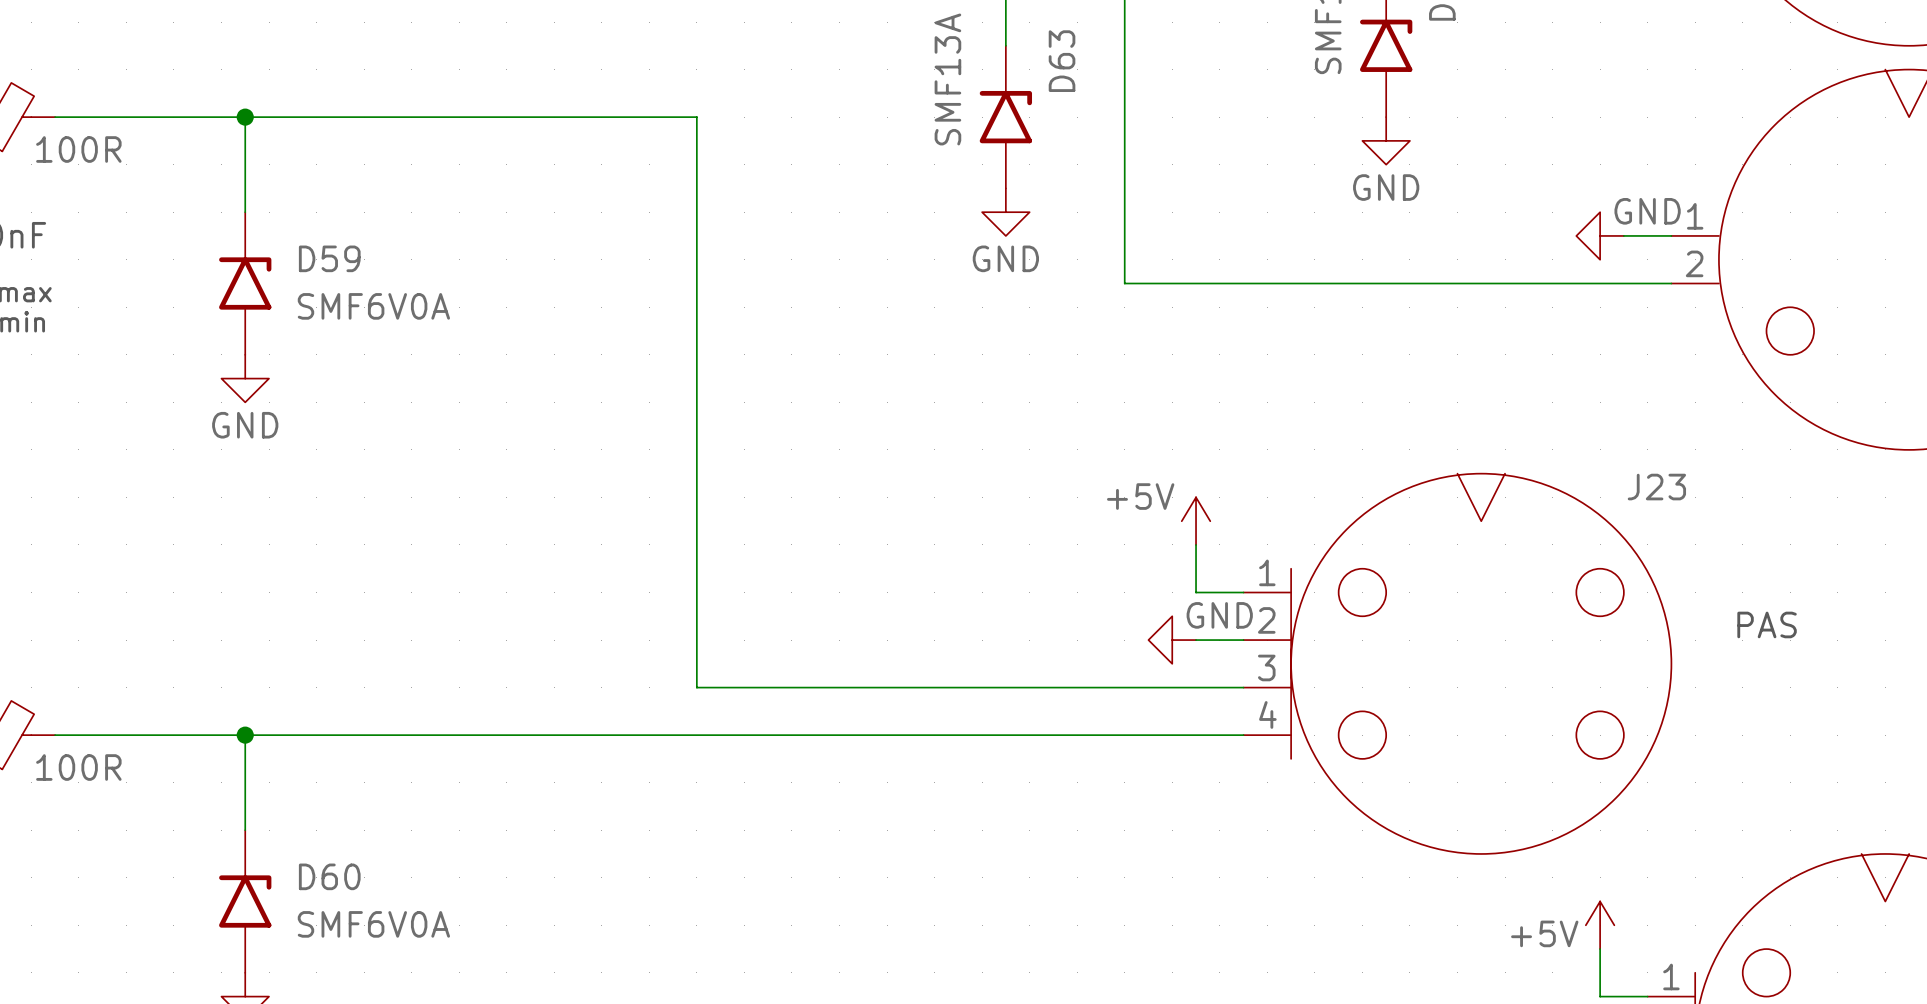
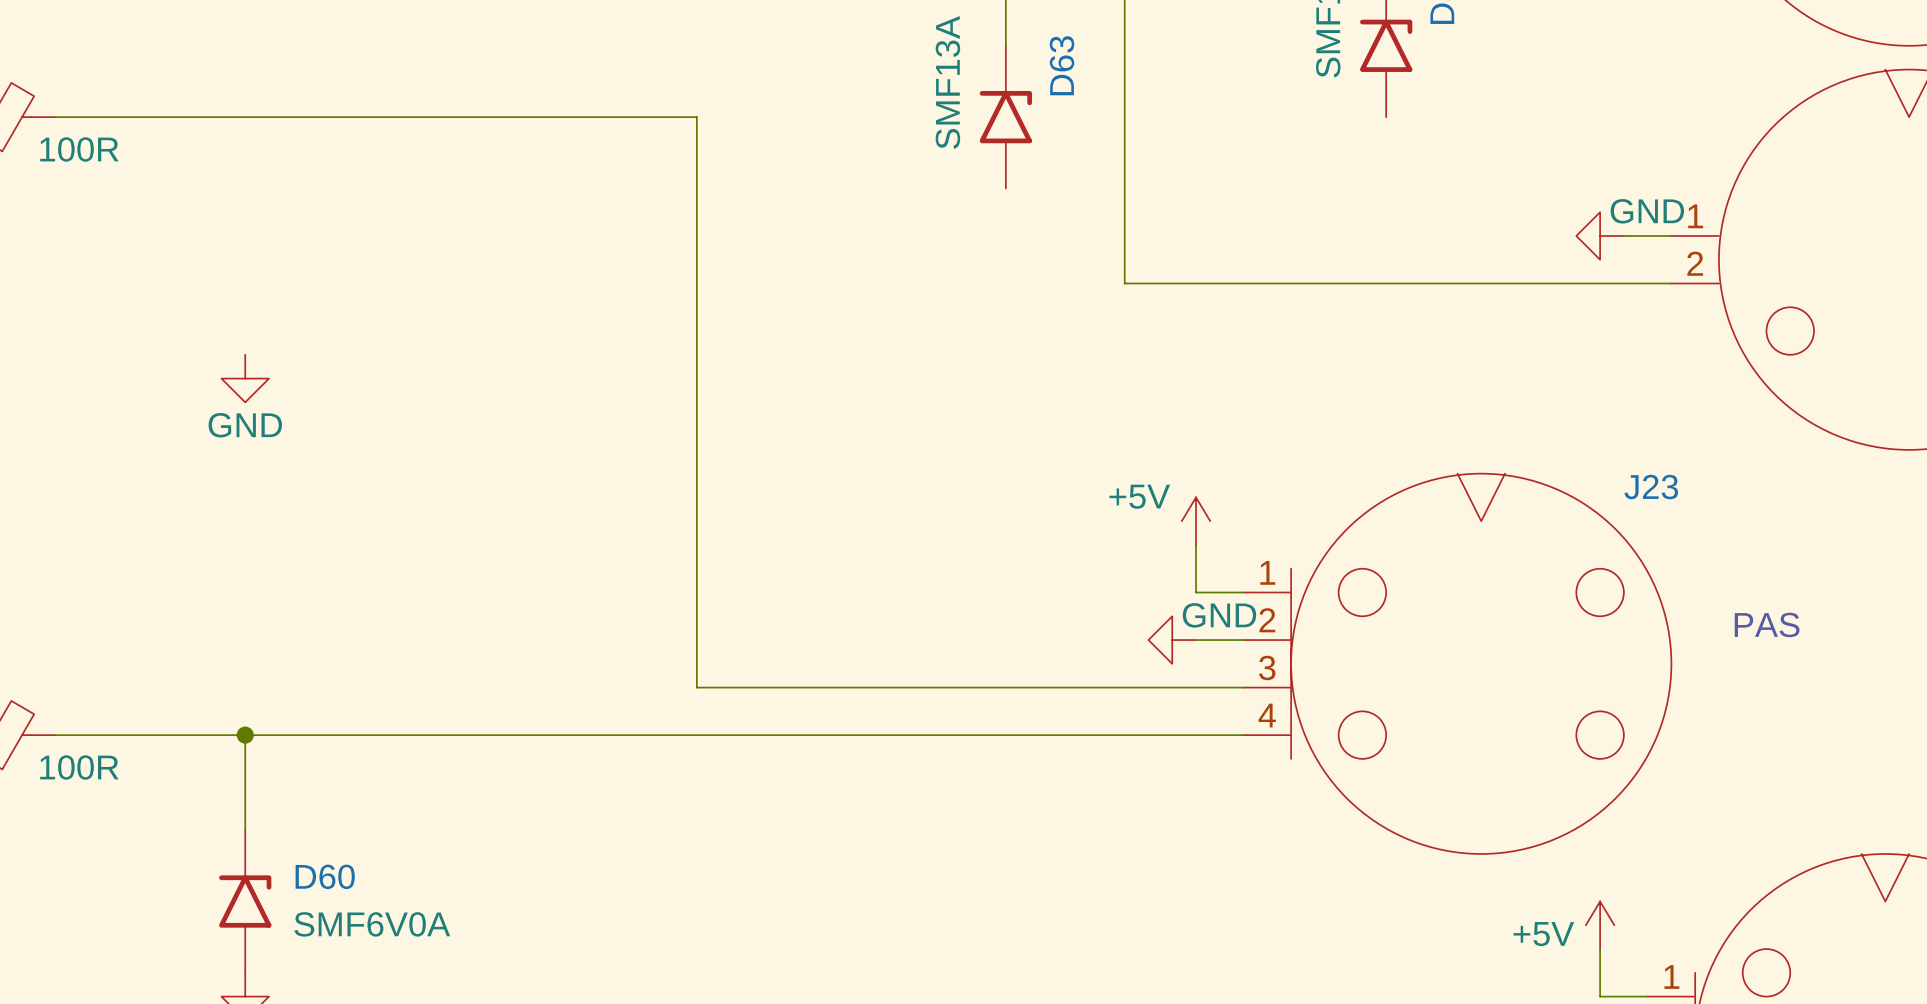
wire: (245, 117) (245, 212) -> none
junction: (245, 117) -> none
power symbol: GND (1386, 140) -> none
power symbol: GND (1005, 212) -> none
D59: SMF6V0A (245, 283) -> none

